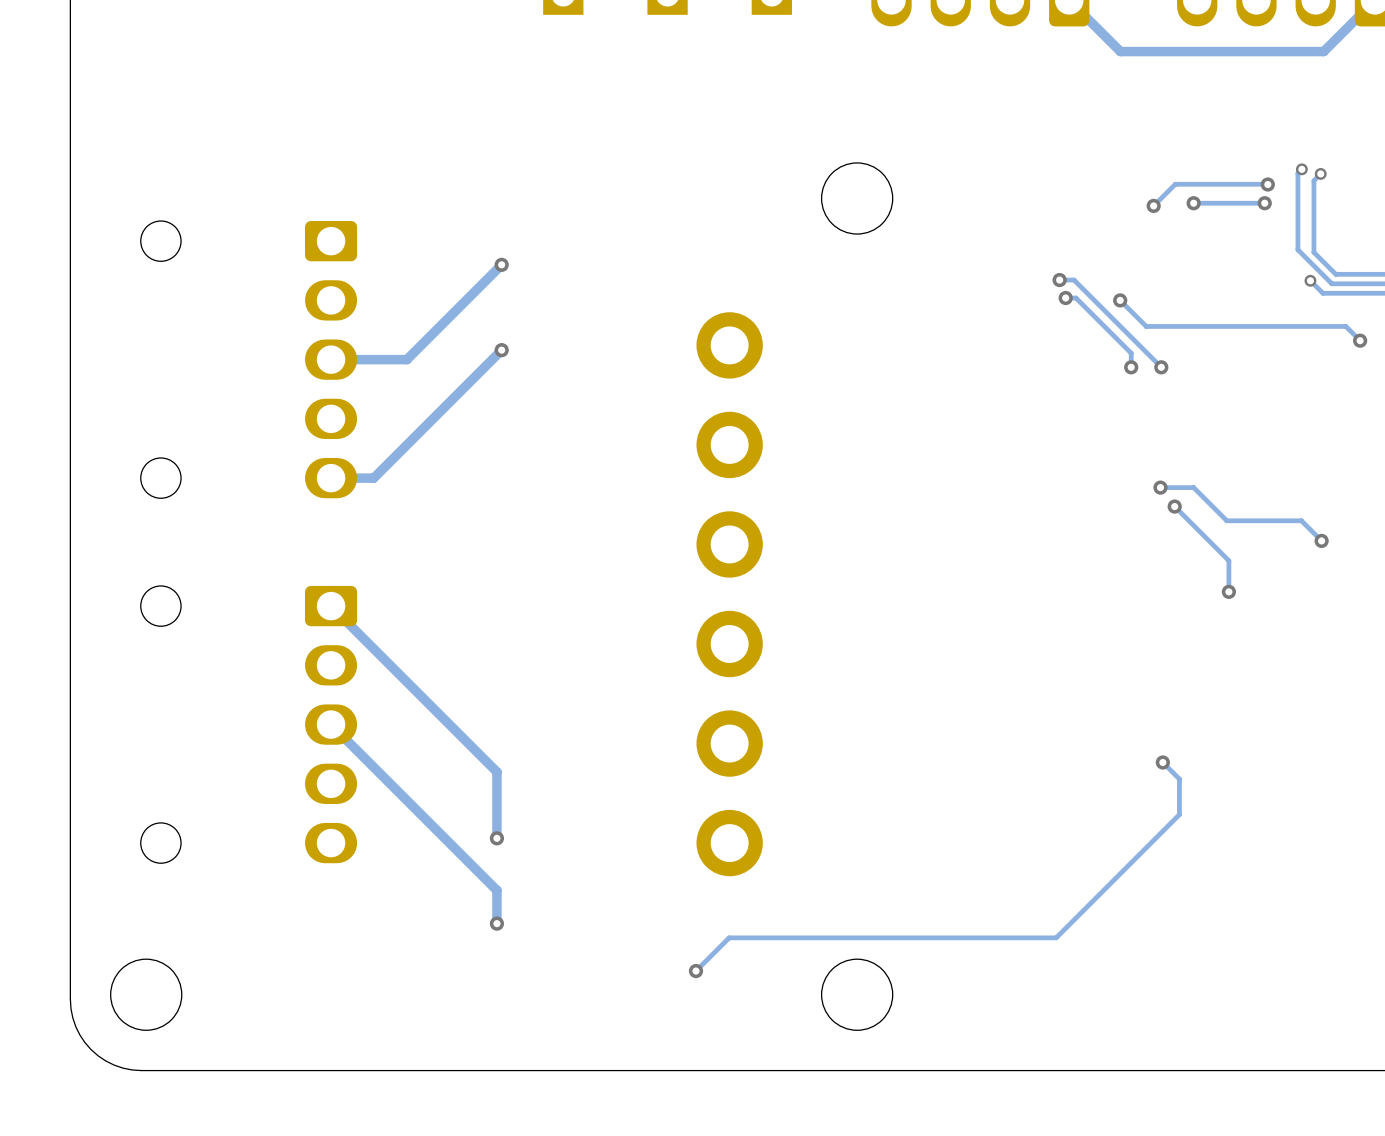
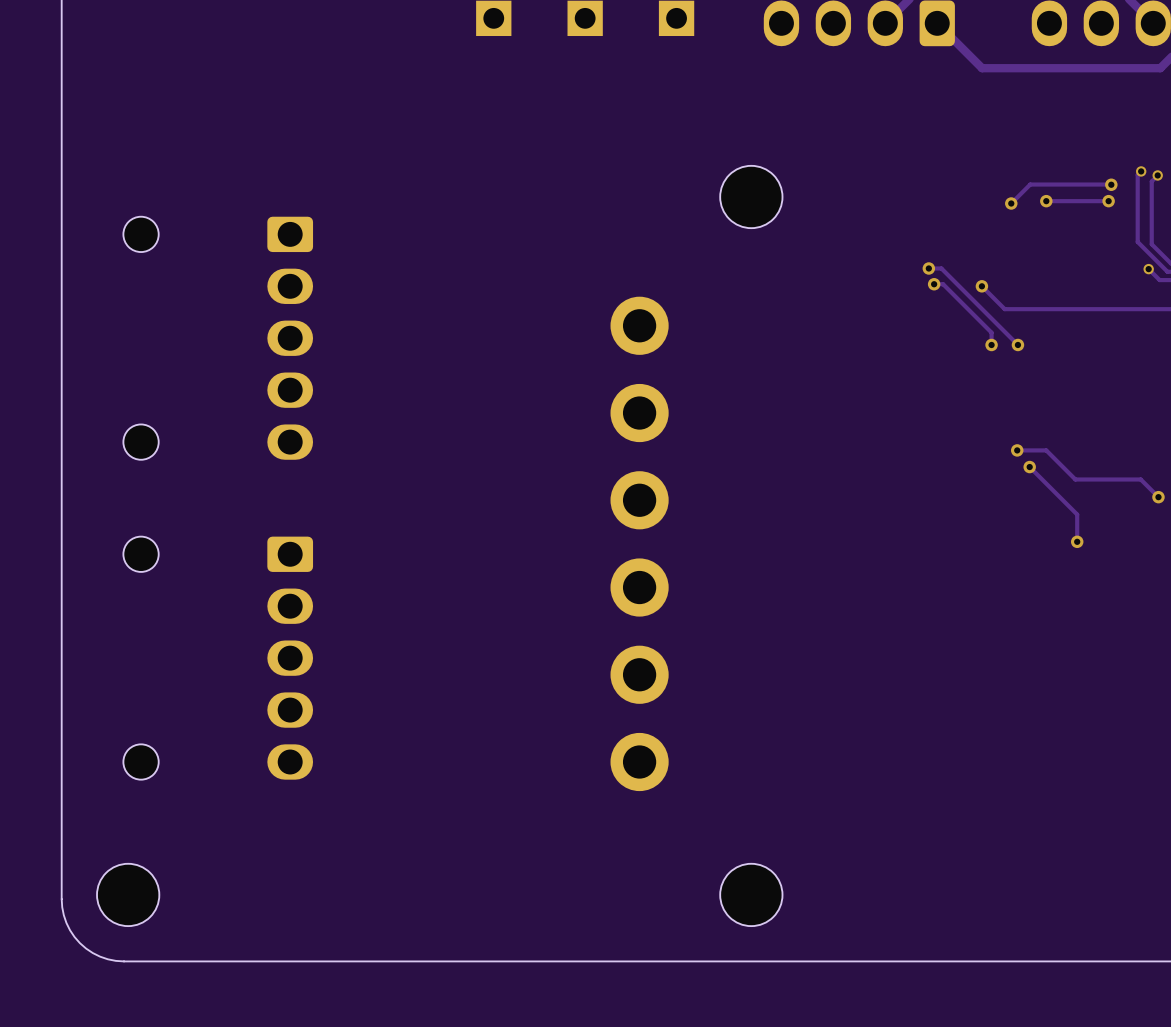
track: (501, 264) (406, 359) (331, 359) -> none
via: (501, 264) -> none
track: (501, 350) (373, 478) (331, 478) -> none
via: (501, 350) -> none
track: (331, 606) (496, 771) (496, 838) -> none
track: (331, 724) (496, 890) (496, 923) -> none
track: (1162, 762) (1179, 779) (1179, 814) (1056, 937) (729, 937) (696, 971) -> none
via: (1162, 762) -> none
via: (496, 838) -> none
via: (496, 923) -> none
via: (696, 971) -> none

